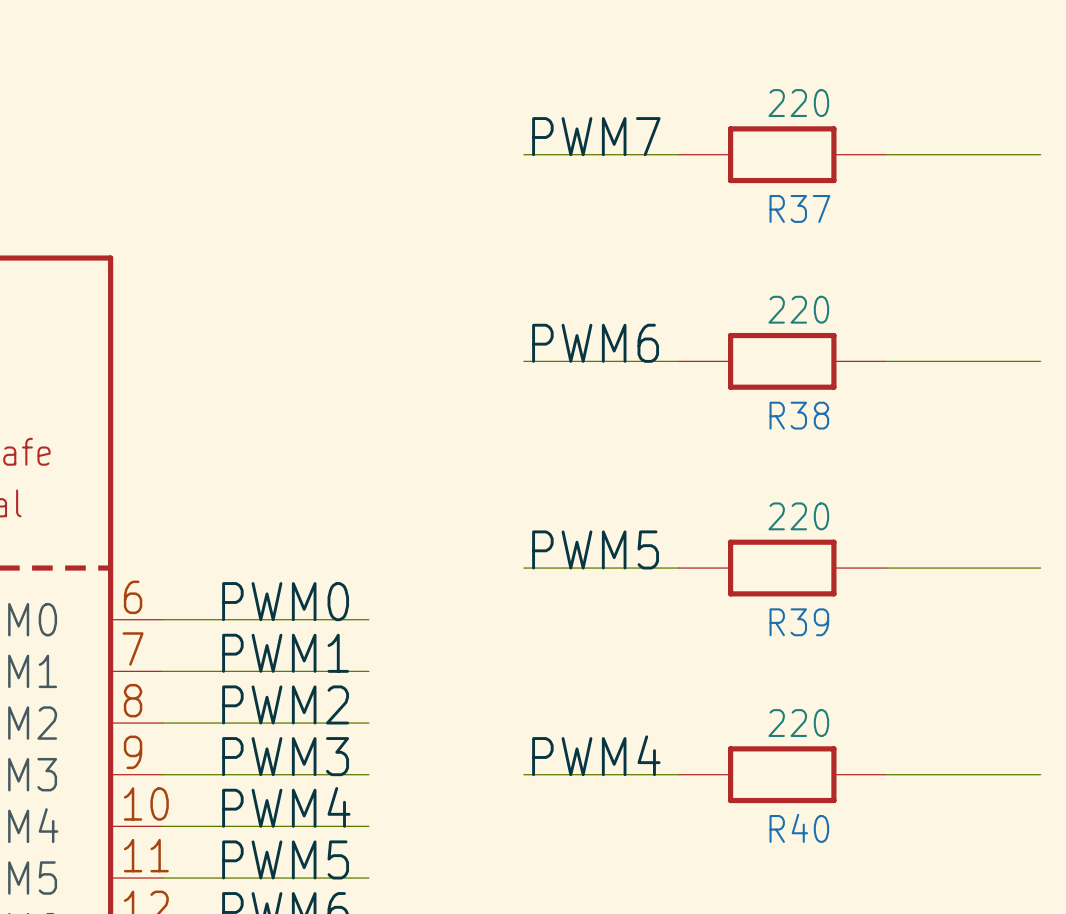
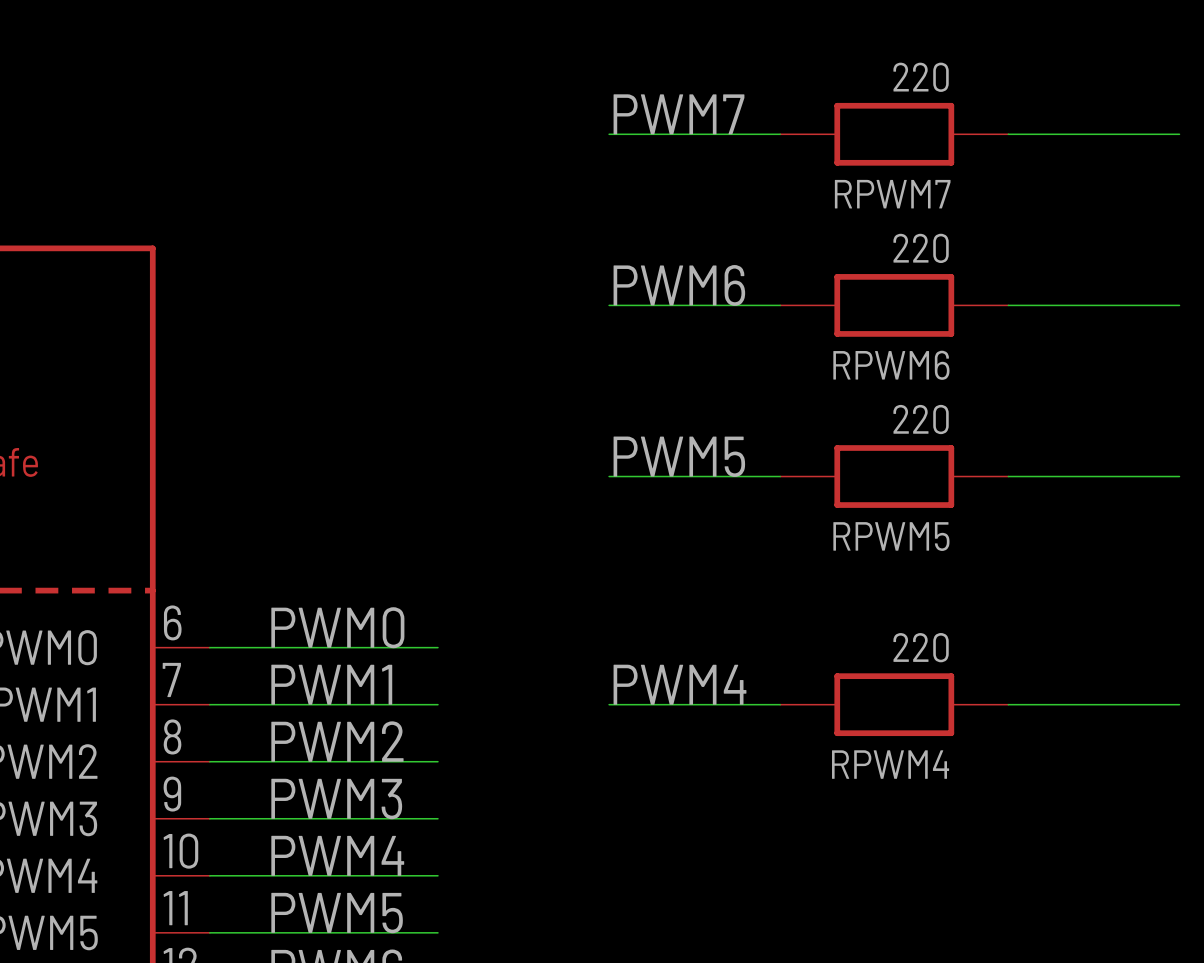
R37 name: R37 (799, 208) -> RPWM7 (892, 194)
RPWM6: none -> 220 (894, 305)
label position: PWM6 (595, 343) -> PWM6 (679, 285)
wire: (523, 361) (678, 361) -> (609, 476) (780, 476)
R38: 220 (782, 361) -> none
wire: (885, 361) (1040, 361) -> (1008, 476) (1179, 476)
RPWM5: none -> 220 (894, 476)
label position: PWM5 (595, 549) -> PWM5 (679, 456)
wire: (523, 568) (678, 568) -> (609, 704) (780, 704)
R39: 220 (782, 568) -> none
wire: (885, 568) (1040, 568) -> (1008, 704) (1179, 704)
RPWM4: none -> 220 (894, 704)
label position: PWM4 (596, 755) -> PWM4 (679, 684)
wire: (523, 774) (678, 774) -> (609, 305) (780, 305)
R40: 220 (782, 774) -> none
wire: (885, 774) (1040, 774) -> (1008, 305) (1179, 305)

